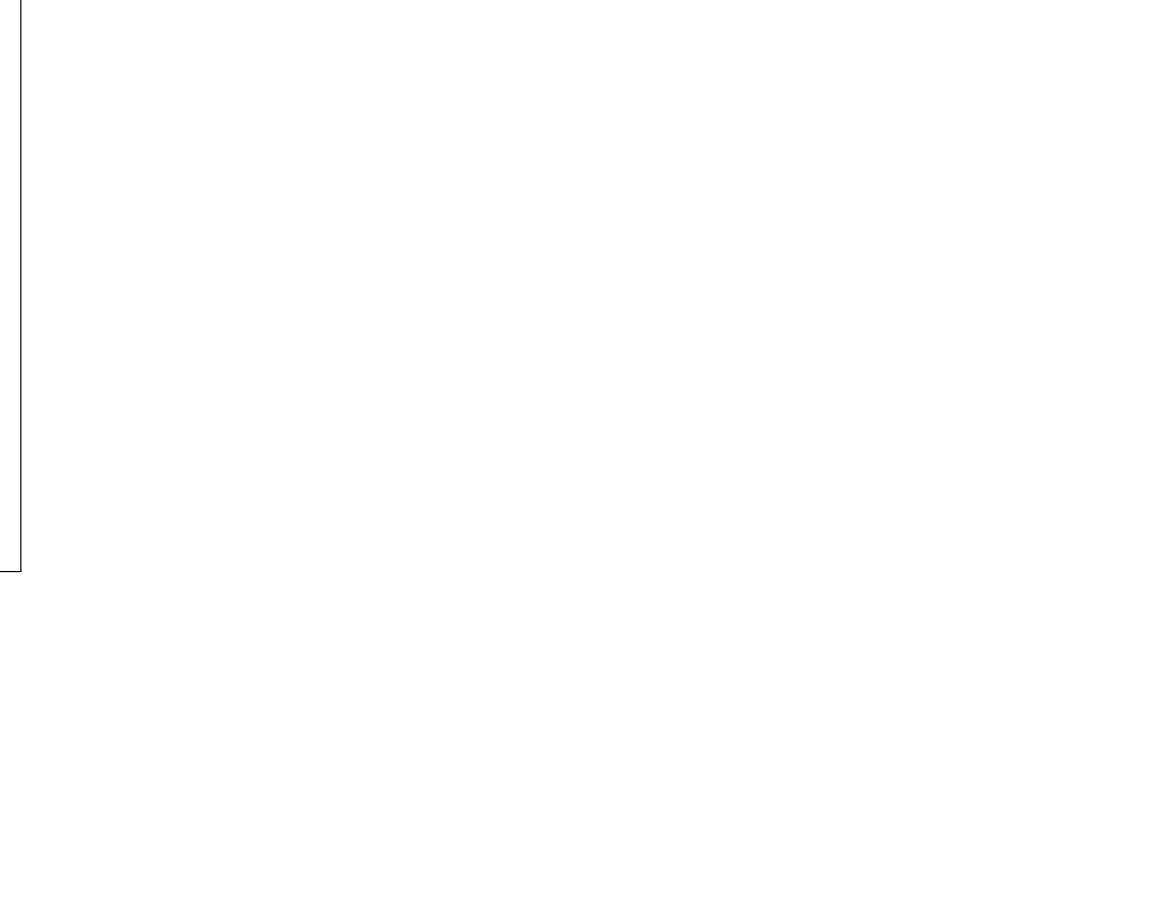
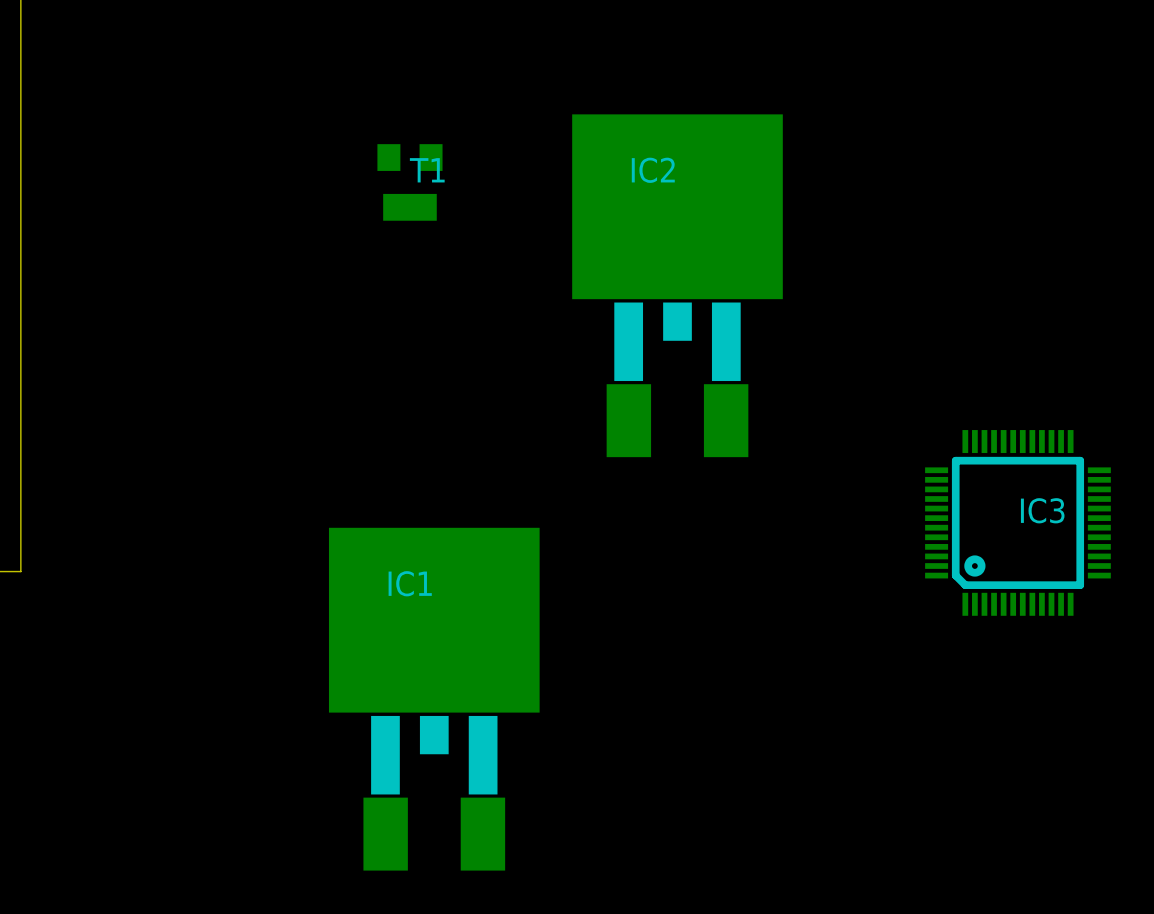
T1: none -> (409, 182)
IC2: none -> (677, 285)
IC3: none -> (1017, 522)
IC1: none -> (434, 699)

